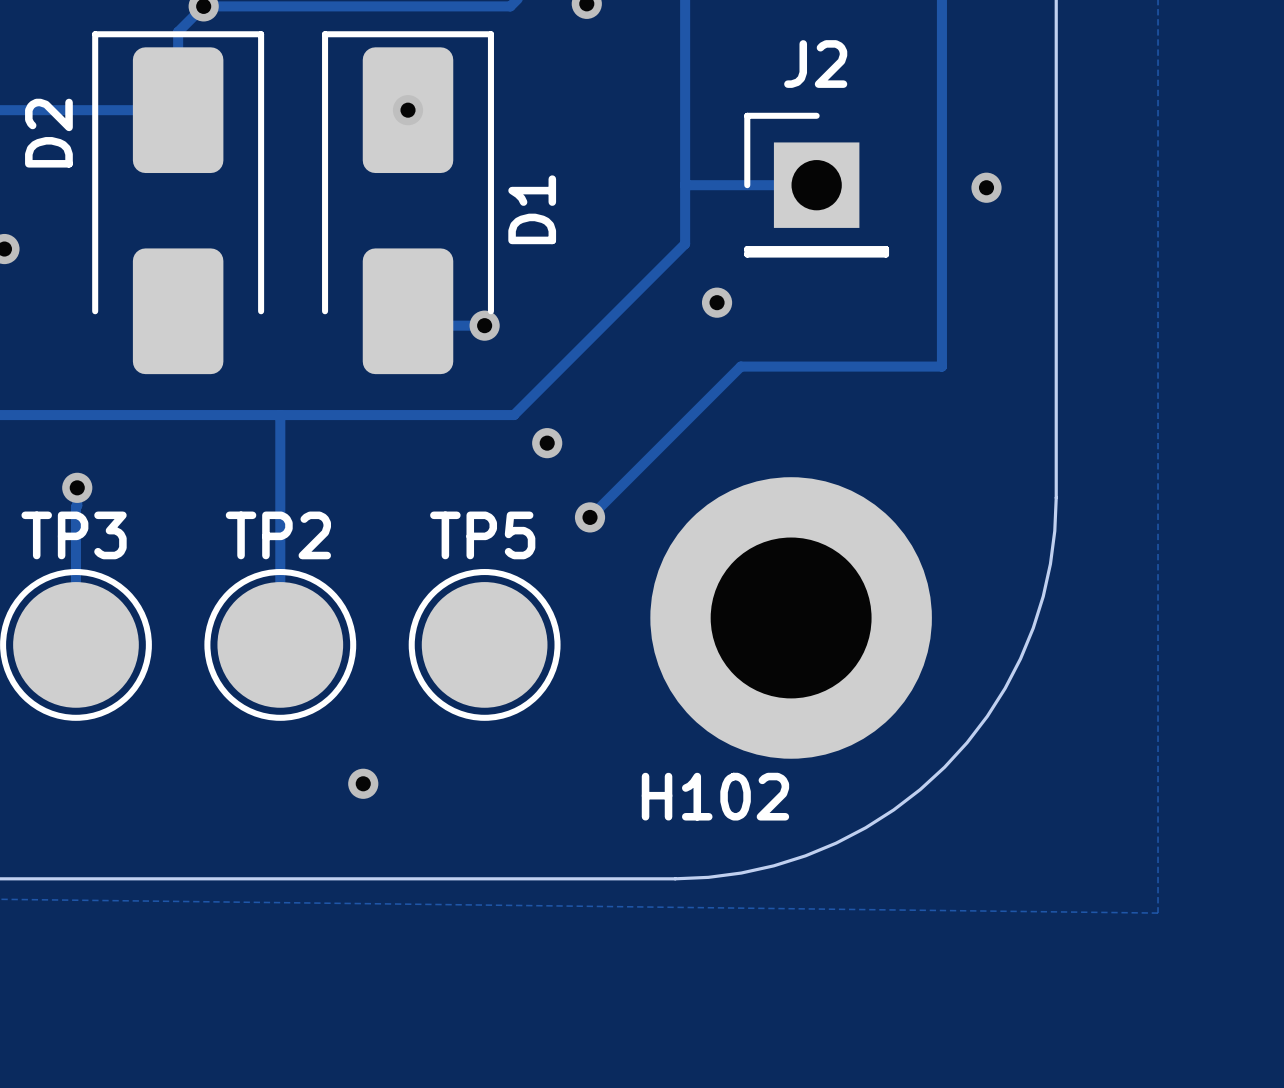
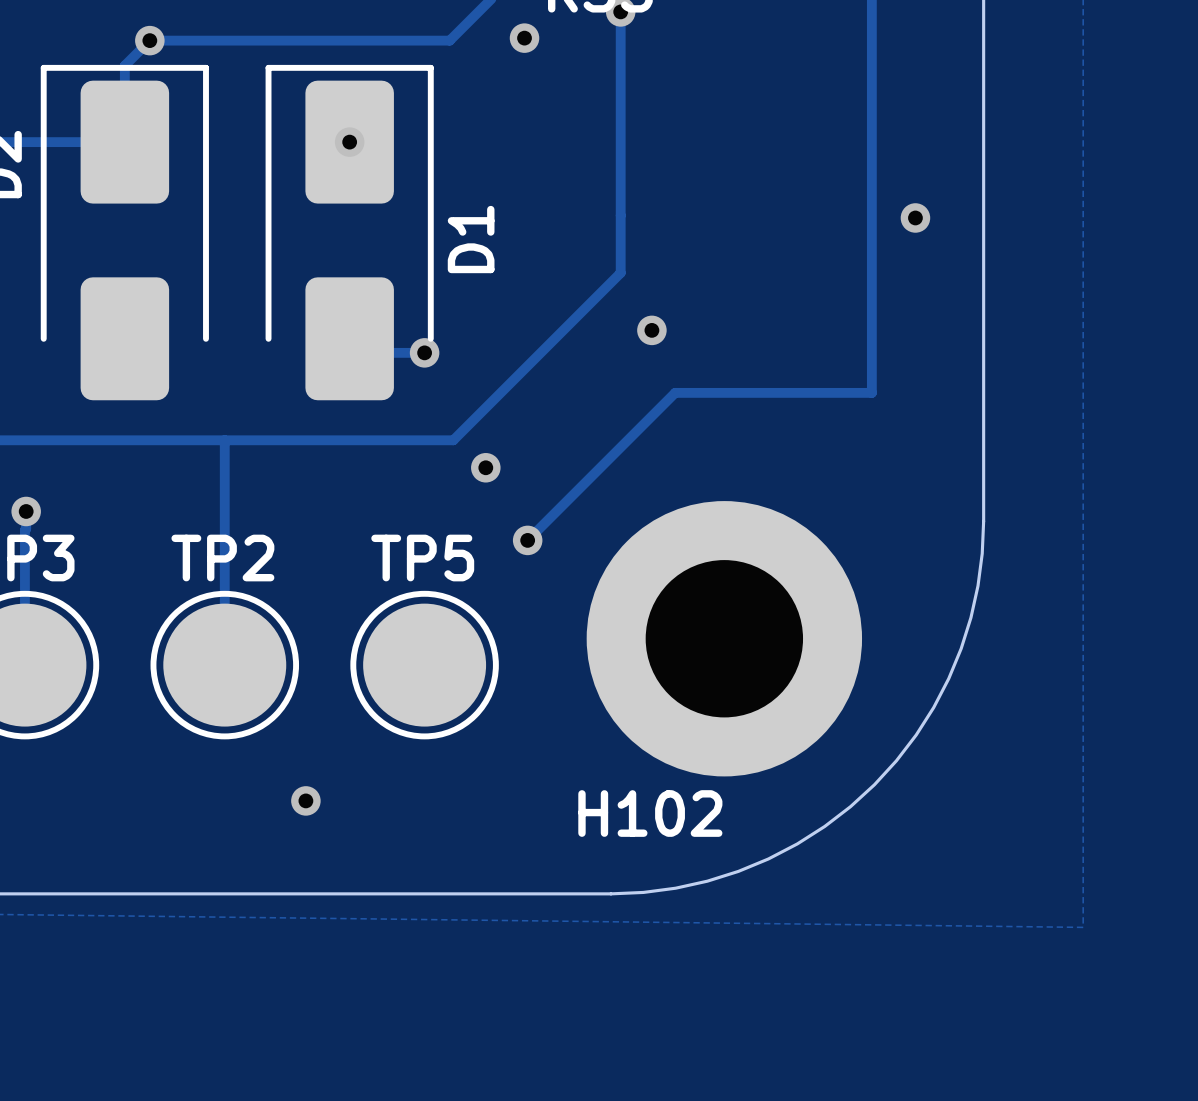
track: (685, 185) (816, 185) -> none
J2: (816, 185) -> none

